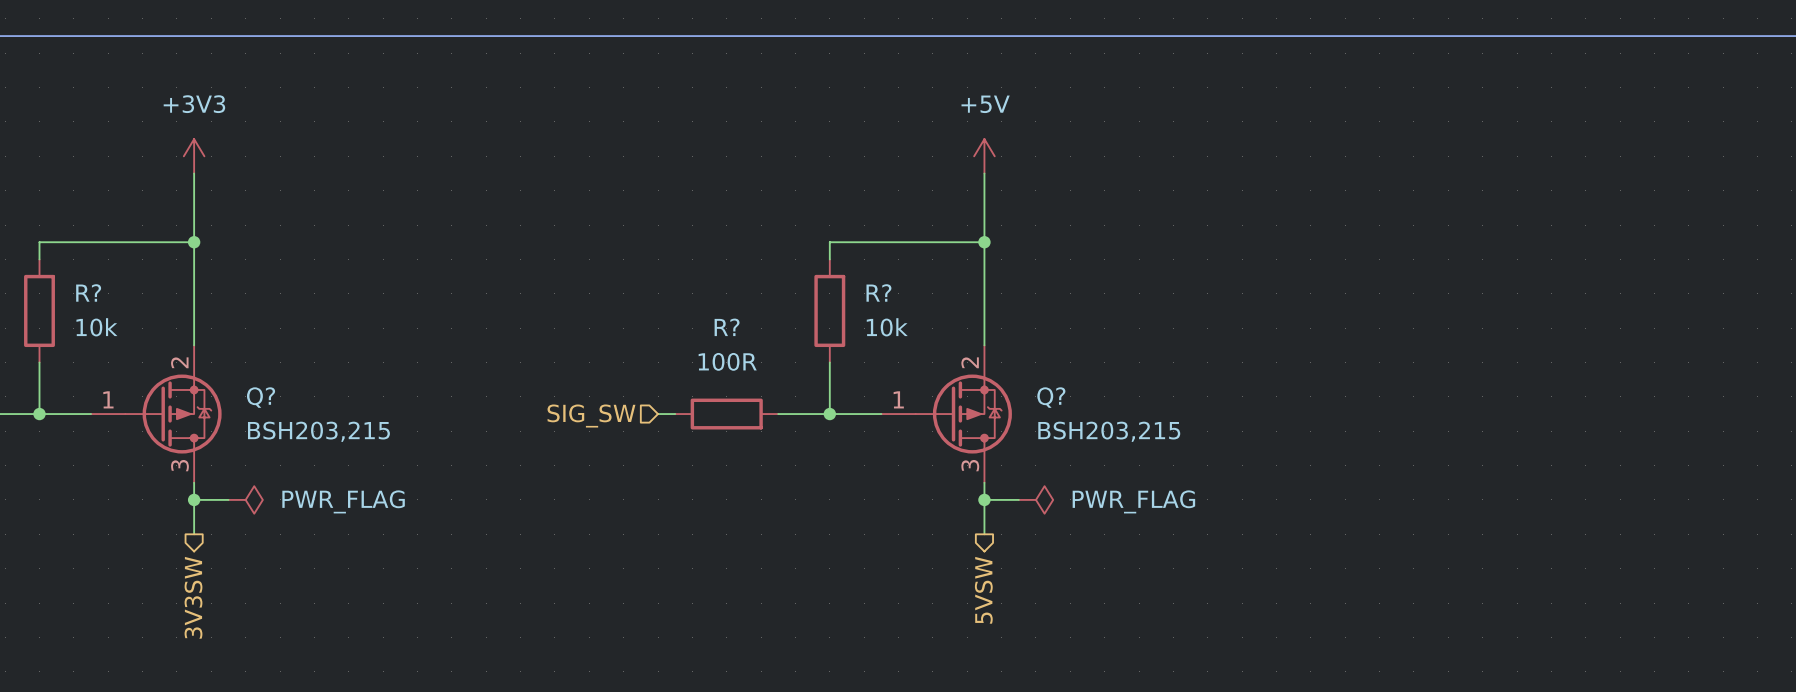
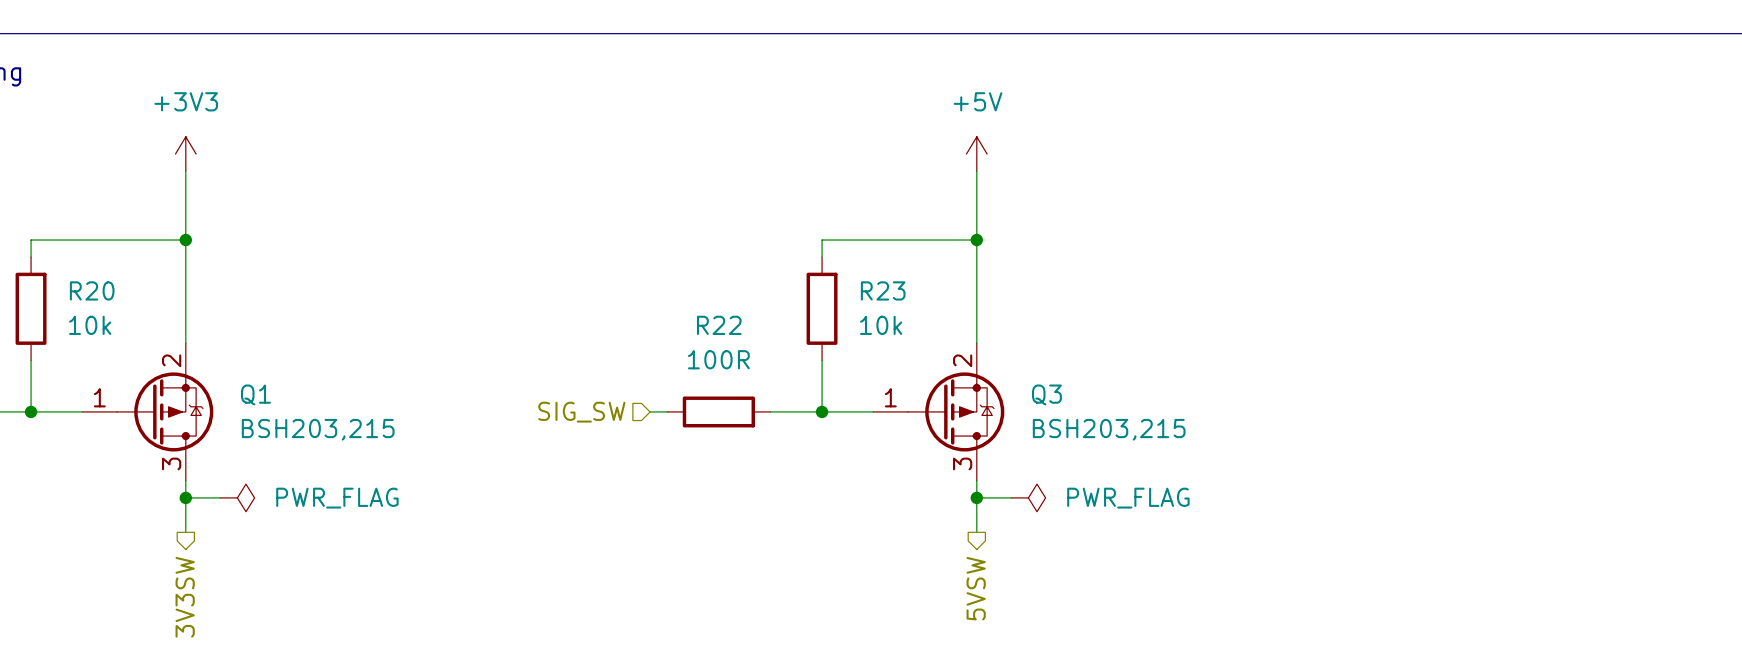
R? name: R? (88, 292) -> R20 (92, 290)
R? name: R? (878, 292) -> R23 (883, 290)
R? name: R? (727, 327) -> R22 (719, 325)
Q? name: Q? (261, 397) -> Q1 (255, 394)
Q? name: Q? (1051, 397) -> Q3 (1046, 394)

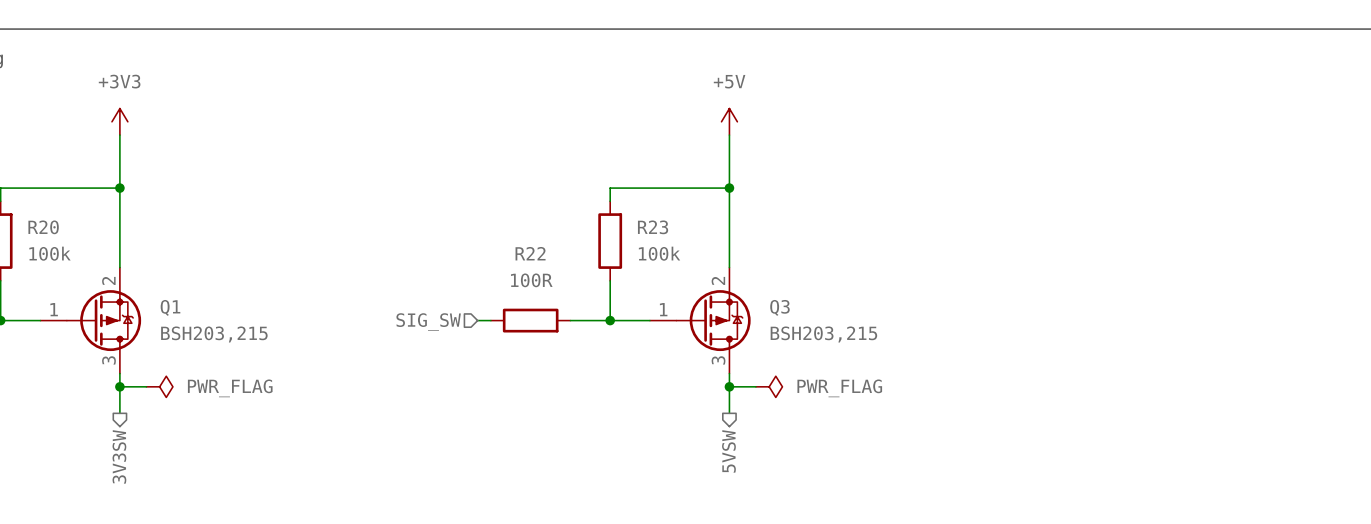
R20 value: 10k (90, 325) -> 100k (49, 253)
R23 value: 10k (881, 325) -> 100k (659, 253)

